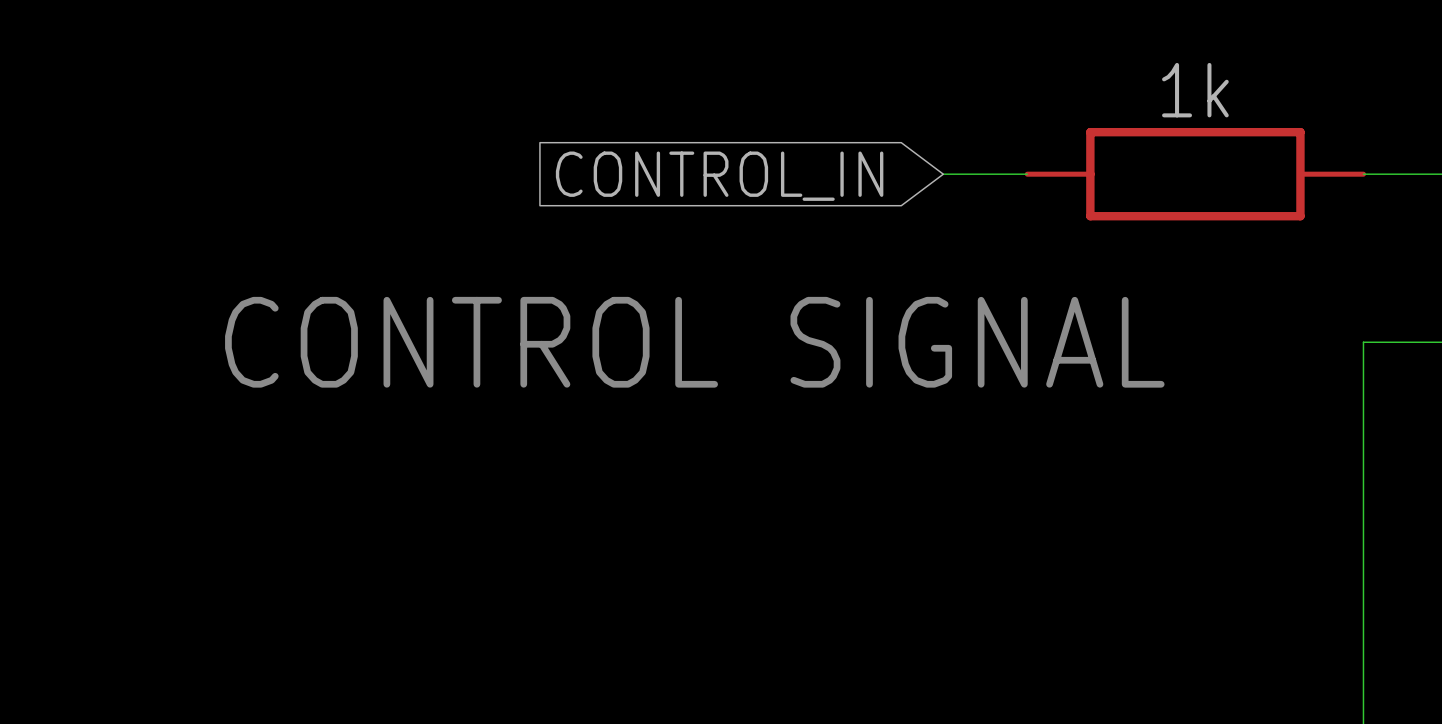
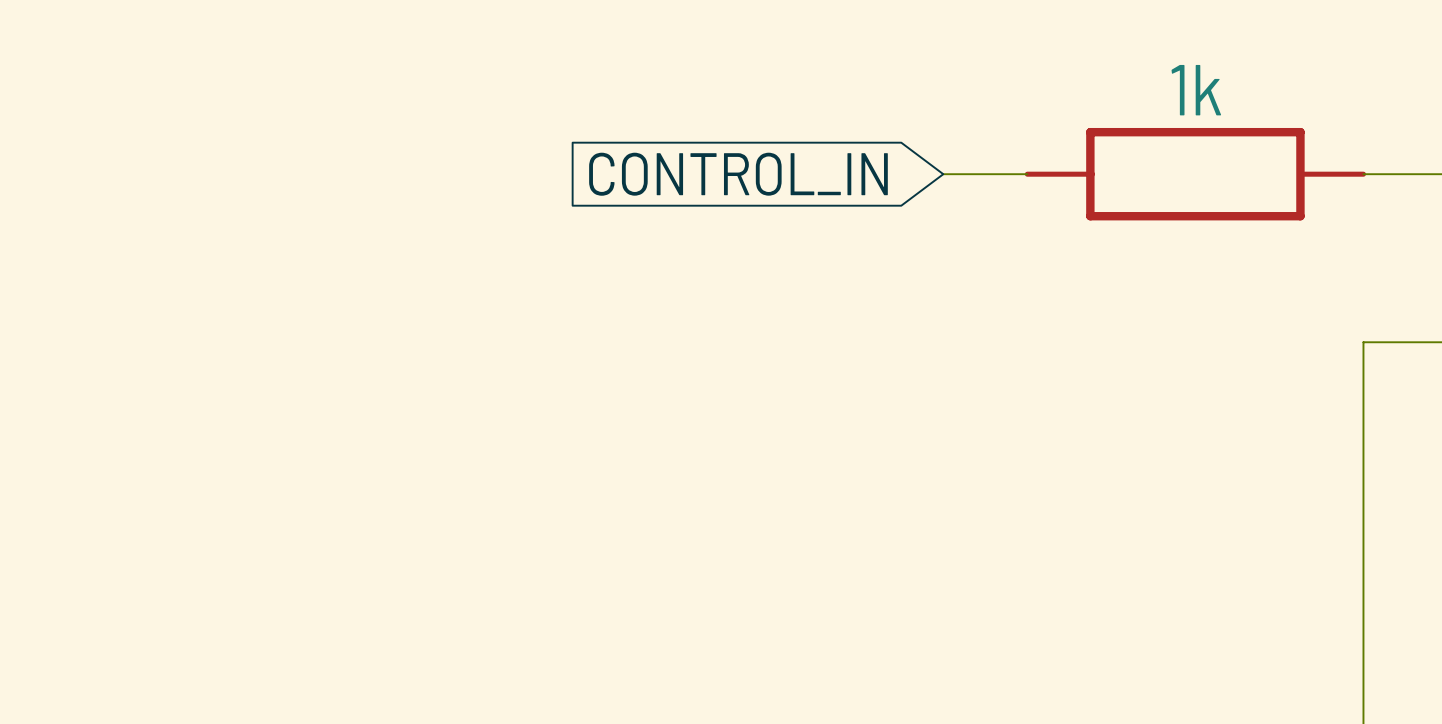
text: CONTROL SIGNAL (694, 342) -> none

